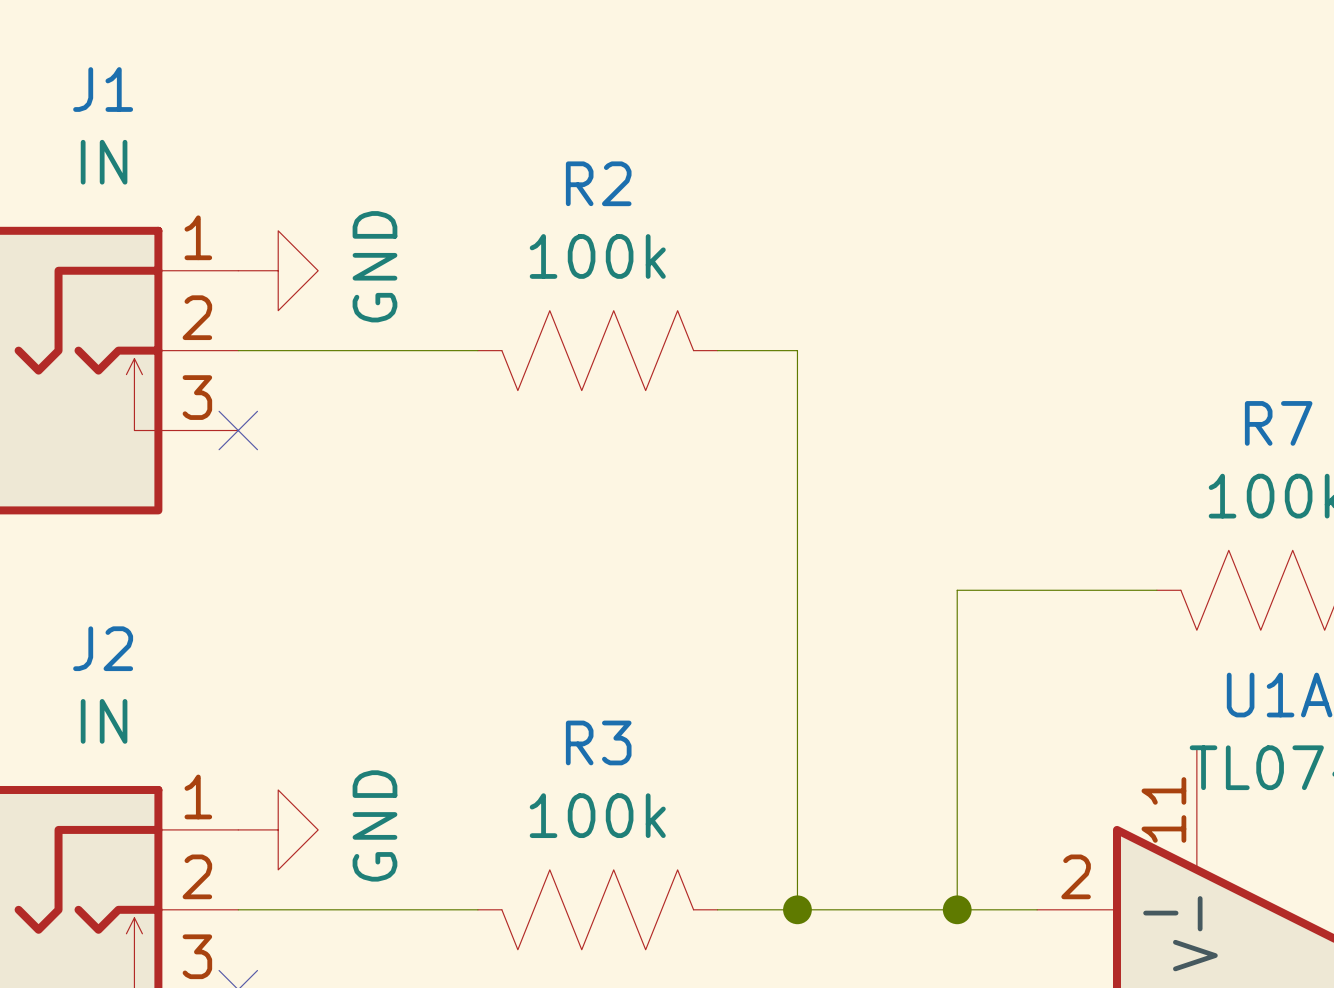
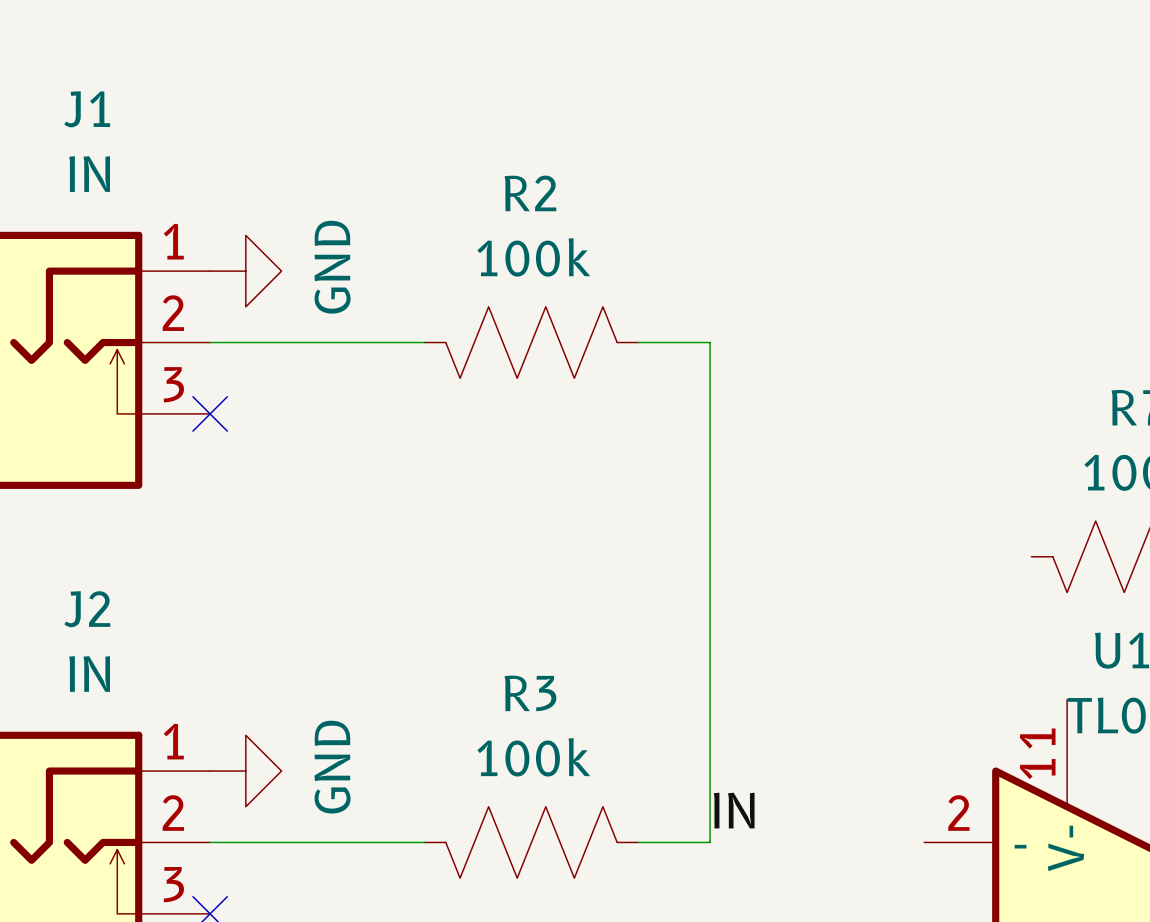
wire: (1156, 590) (957, 590) (957, 909) -> none
label: none -> IN (734, 810)
wire: (797, 909) (1037, 909) -> none
junction: (797, 909) -> none
junction: (957, 909) -> none

